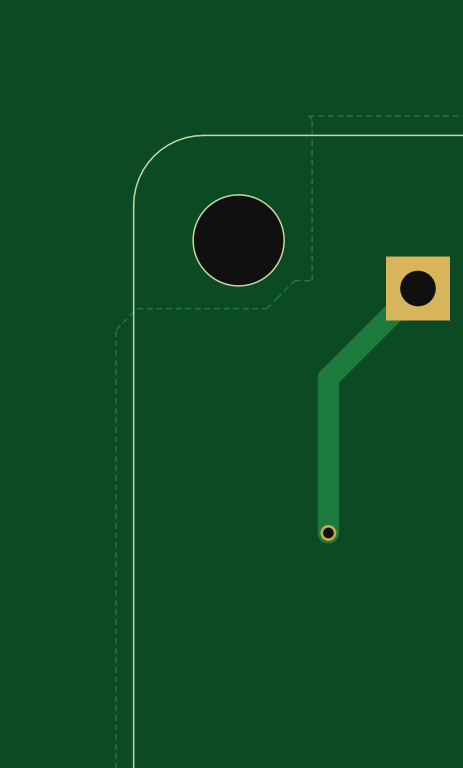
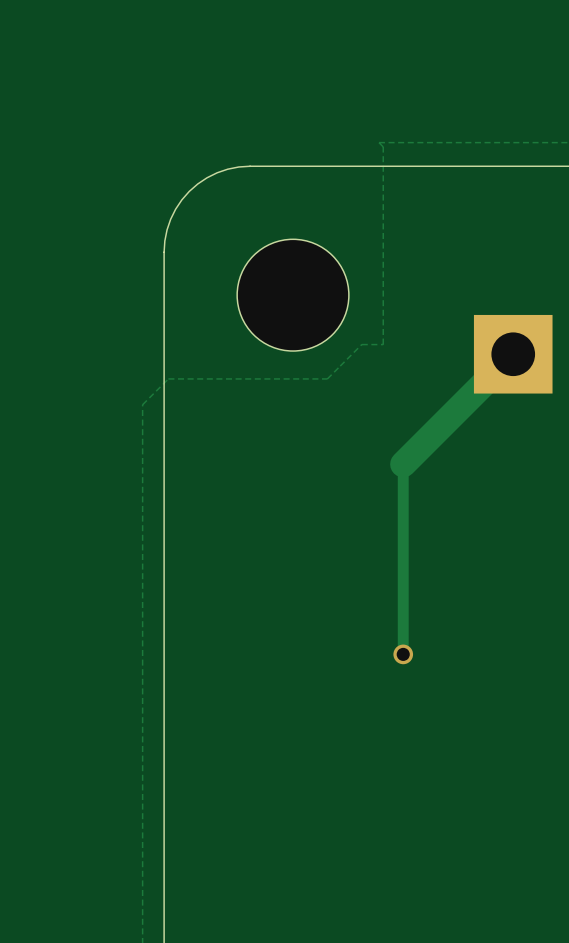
track width: thick (328, 378) (328, 532) -> thin (403, 464) (403, 654)

